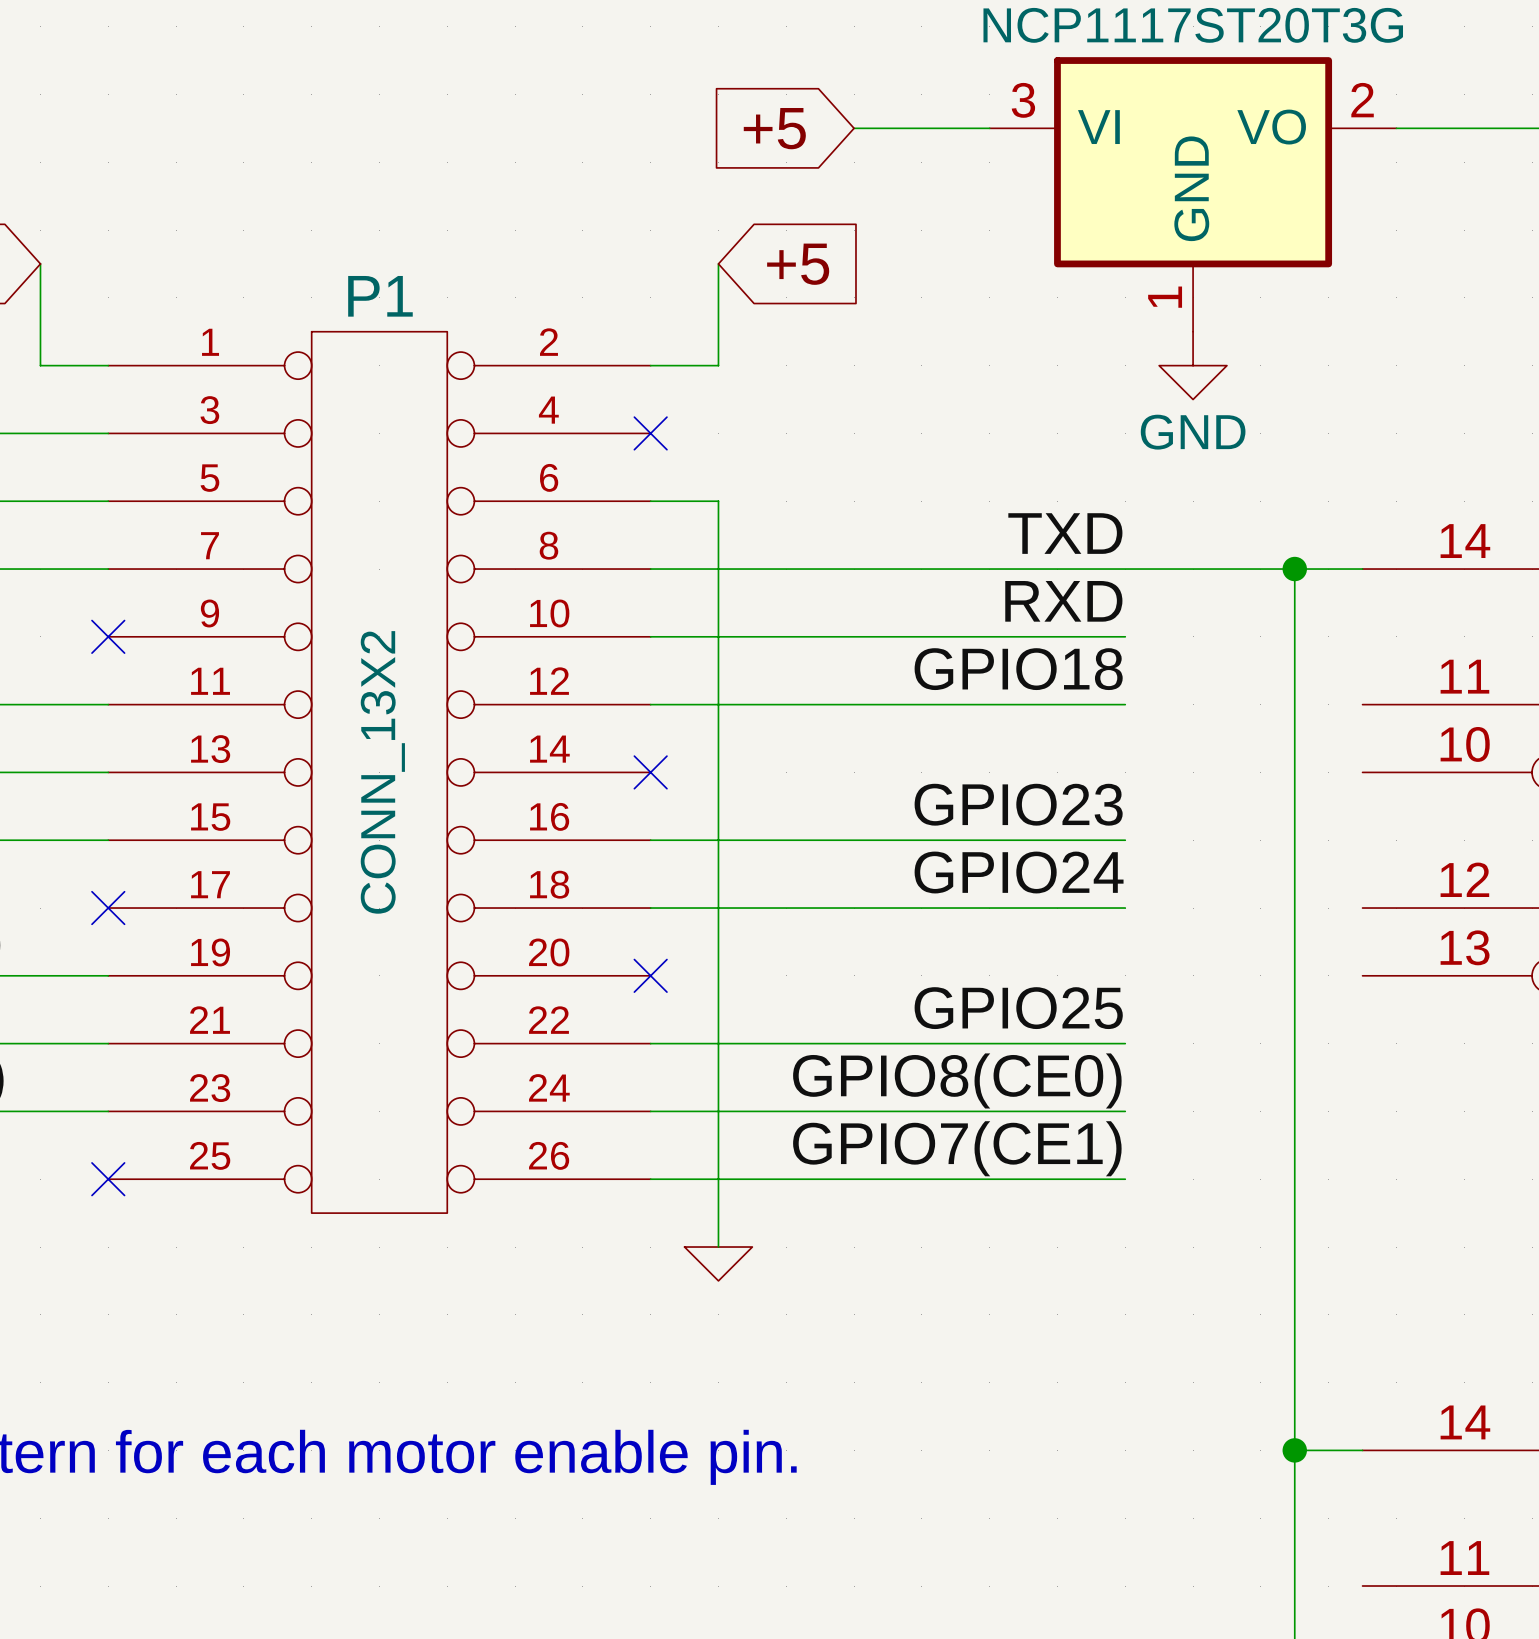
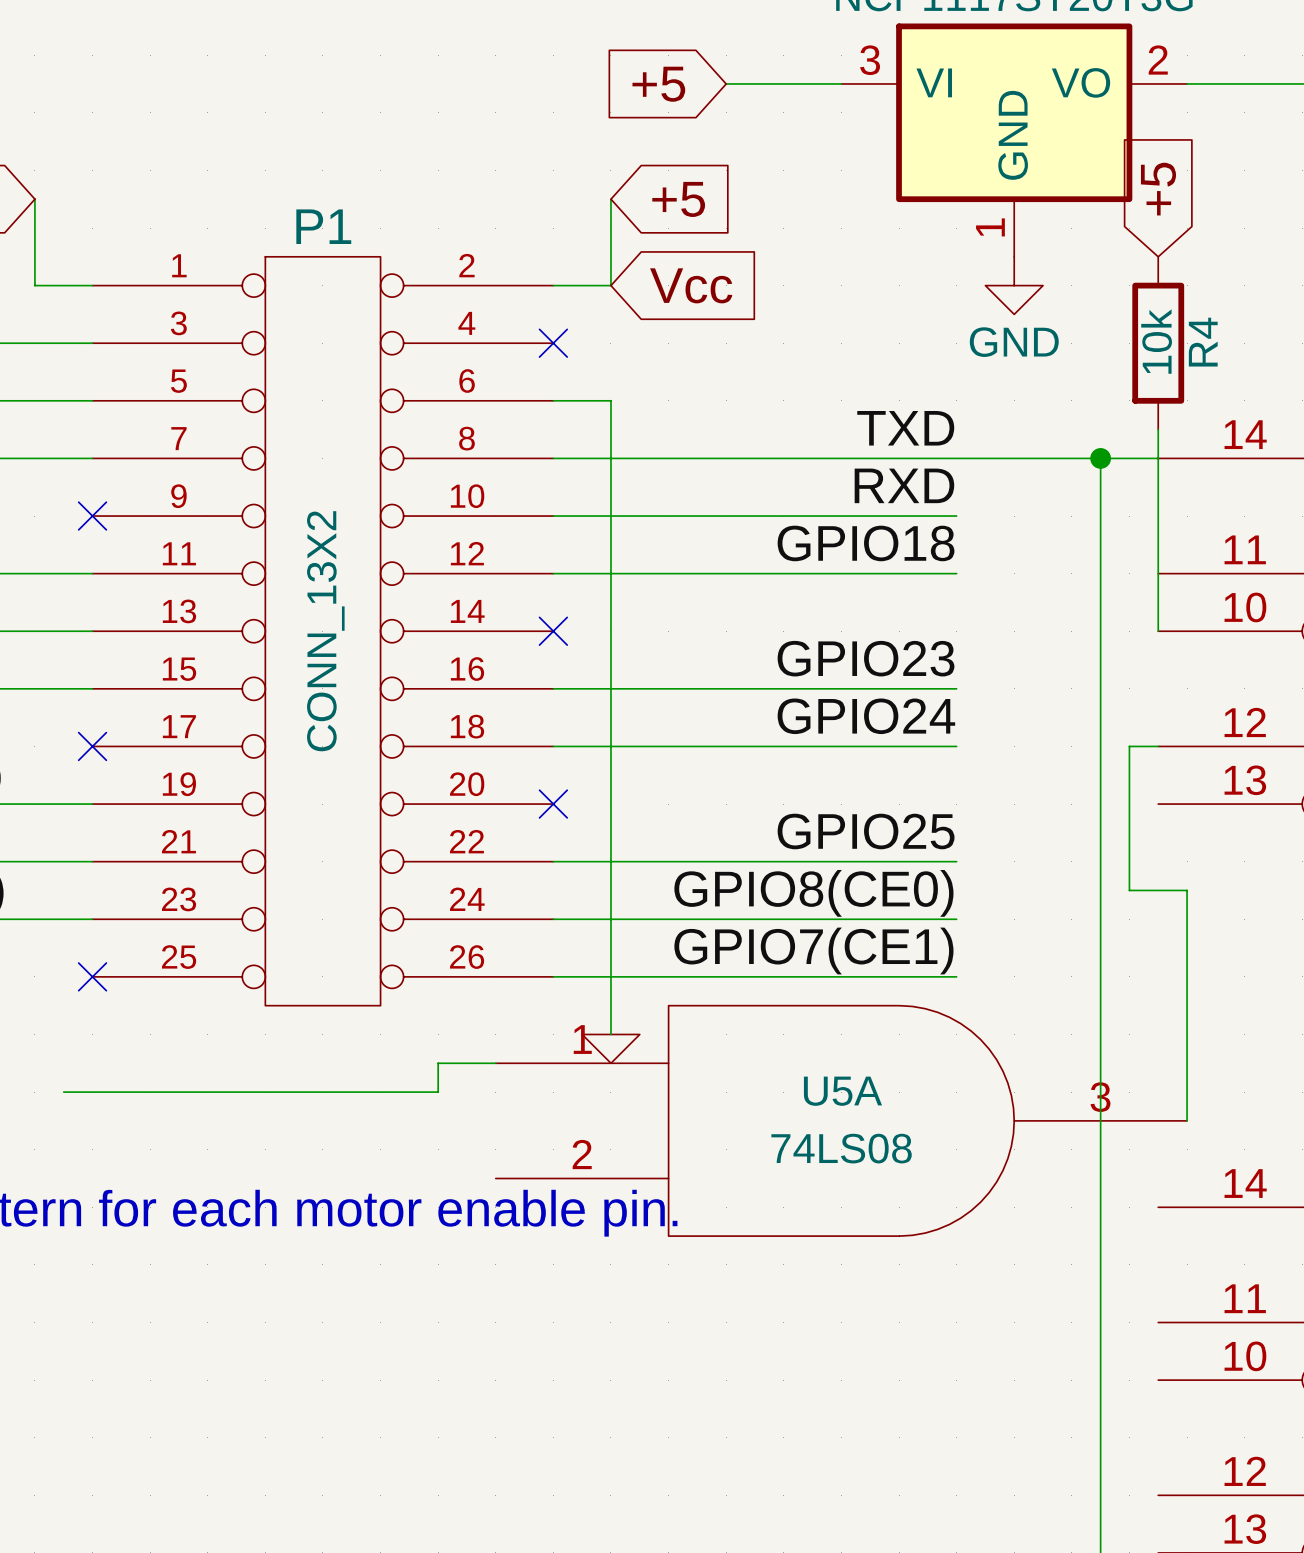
global label: none -> +5 (1158, 189)
global label: none -> Vcc (691, 285)
R4: none -> 10k (1158, 343)
wire: none -> (1158, 429) (1158, 631)
wire: none -> (1158, 746) (1129, 746) (1129, 890) (1187, 890) (1187, 1120)
wire: none -> (495, 1063) (438, 1063) (438, 1092) (63, 1092)
U5A: none -> 74LS08 (841, 1120)
wire: (1294, 1450) (1362, 1450) -> none
junction: (1294, 1450) -> none

